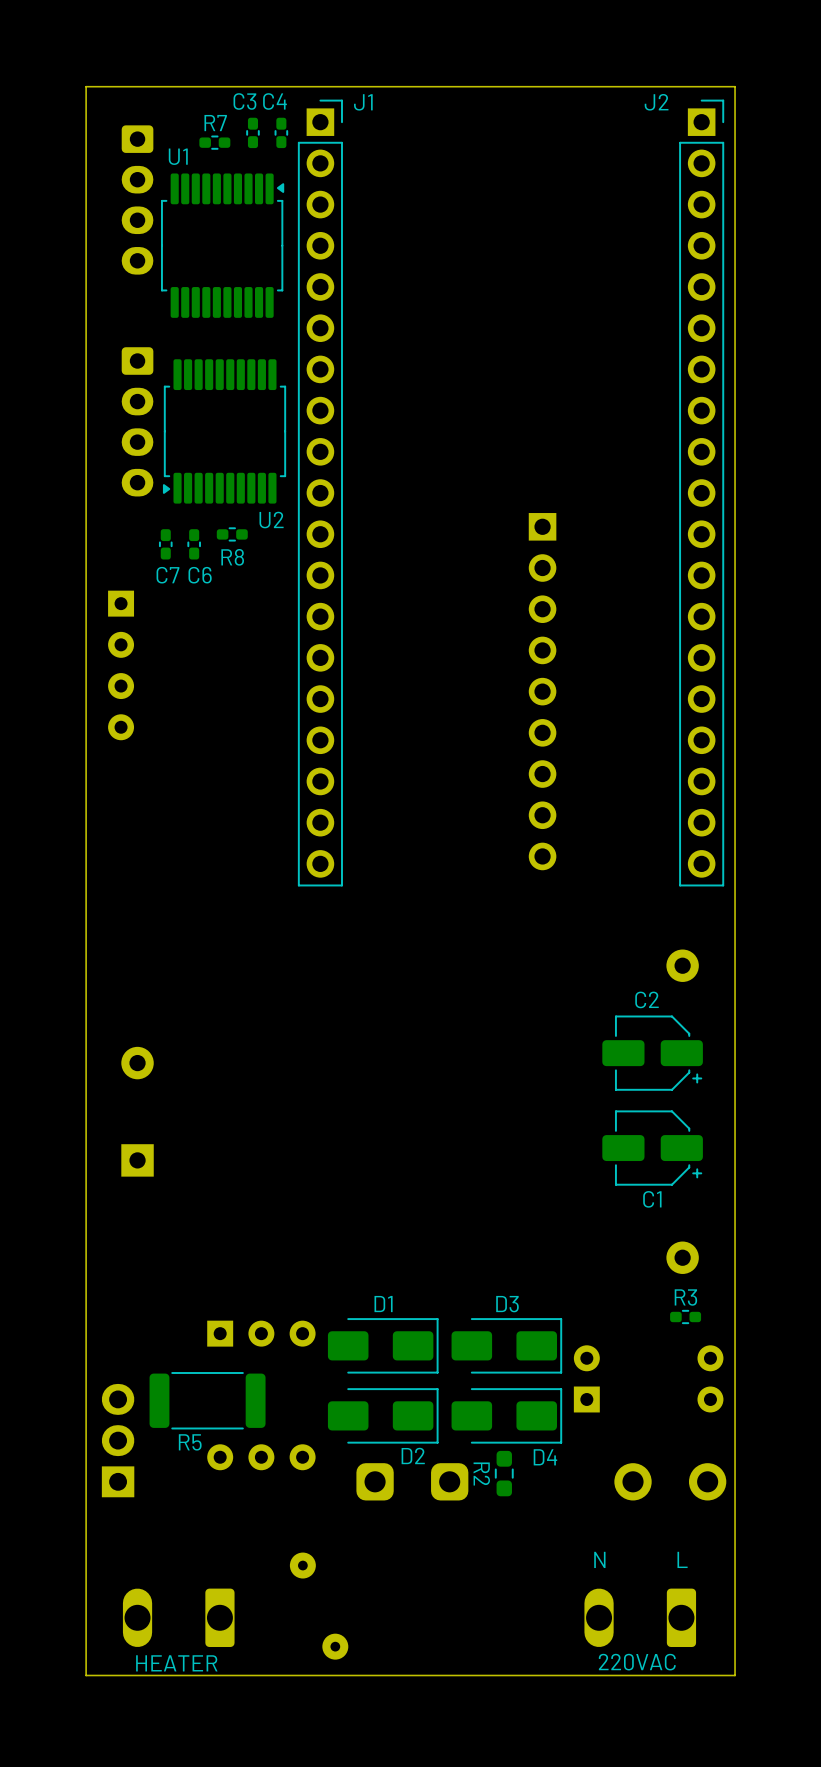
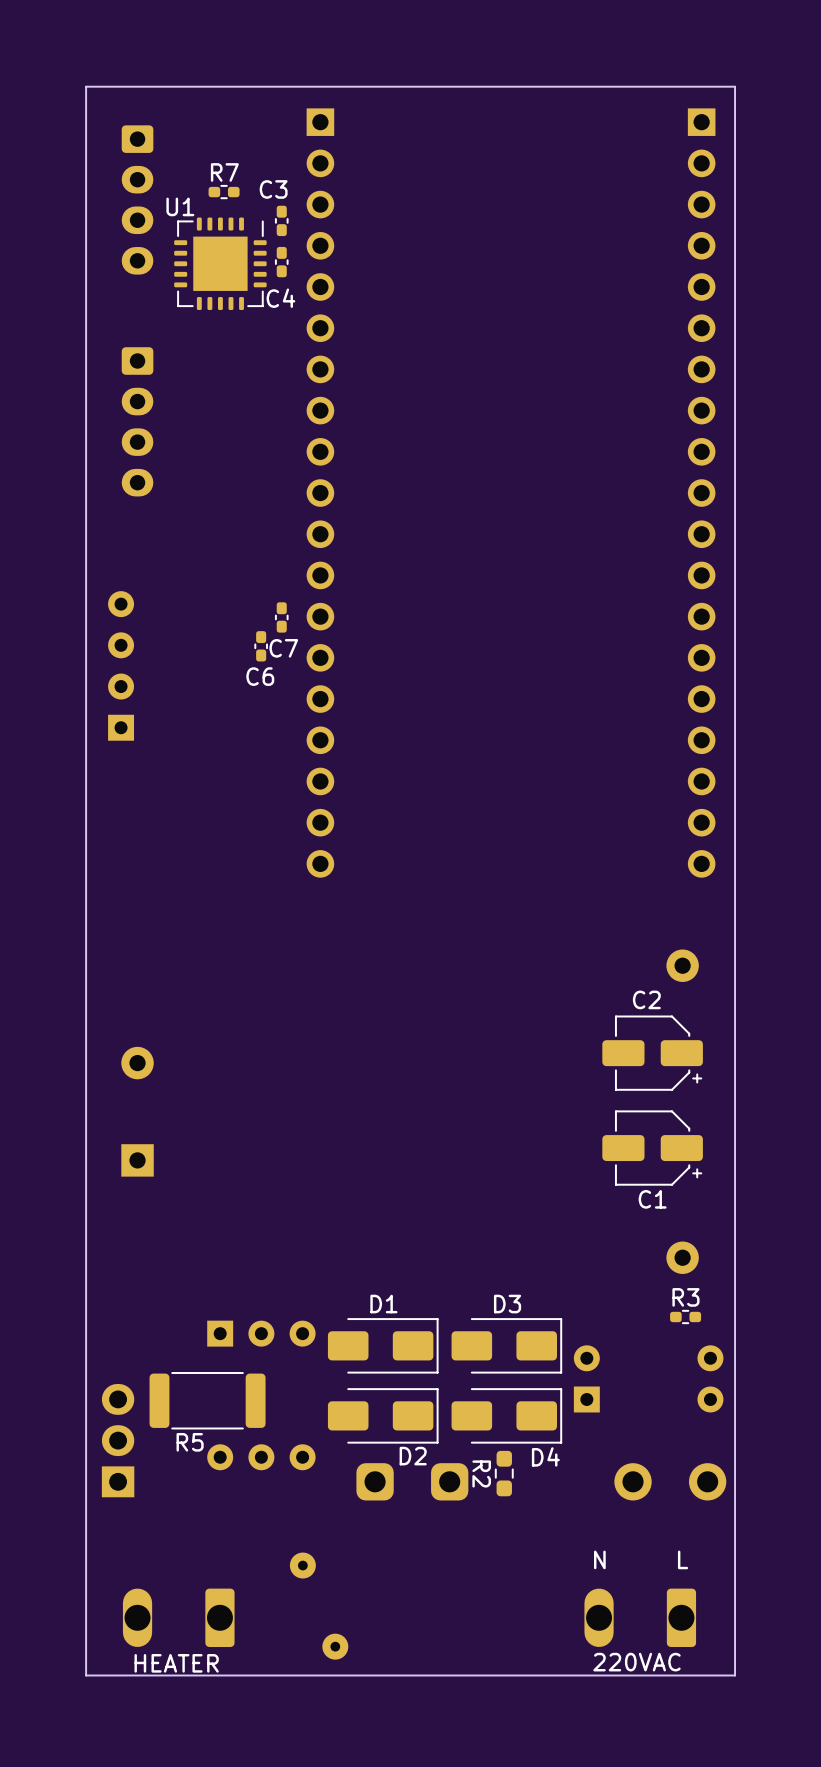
C4 name position: C4 (275, 101) -> C4 (280, 298)
C3 position: (252, 132) -> (281, 220)
C4 position: (281, 132) -> (281, 262)
R7 position: (214, 142) -> (224, 192)
U1 footprint: [160, 173, 285, 318] -> [174, 217, 267, 311]
U2: (224, 431) -> none
J1 side: bottom (320, 493) -> top (701, 493)
J2 side: bottom (701, 493) -> top (320, 493)
R8: (232, 534) -> none
C7 position: (165, 544) -> (281, 617)
C6 position: (194, 544) -> (261, 646)
C6 name position: C6 (200, 575) -> C6 (260, 676)
part rotation: 0° (121, 665) -> 180° (121, 665)
part: (542, 691) -> none

